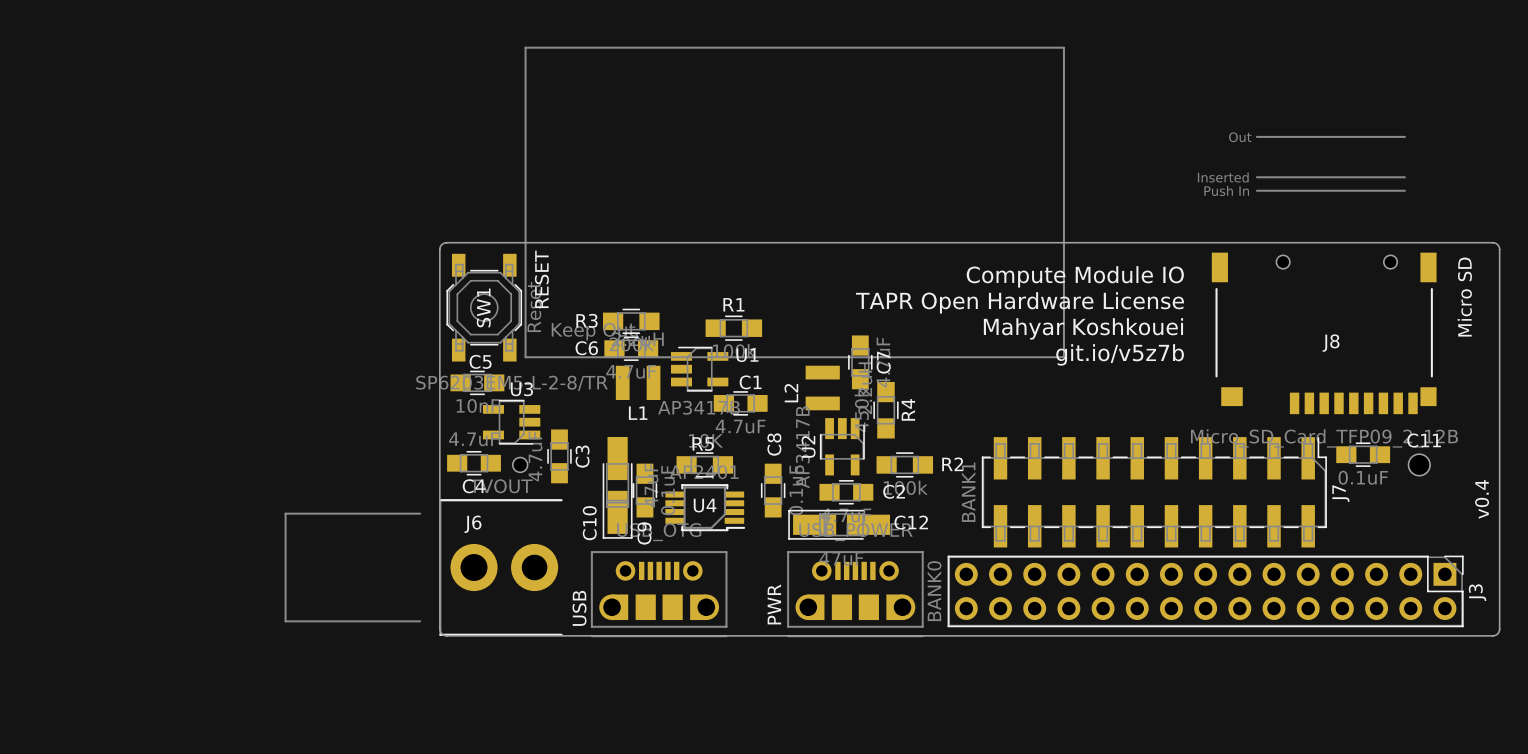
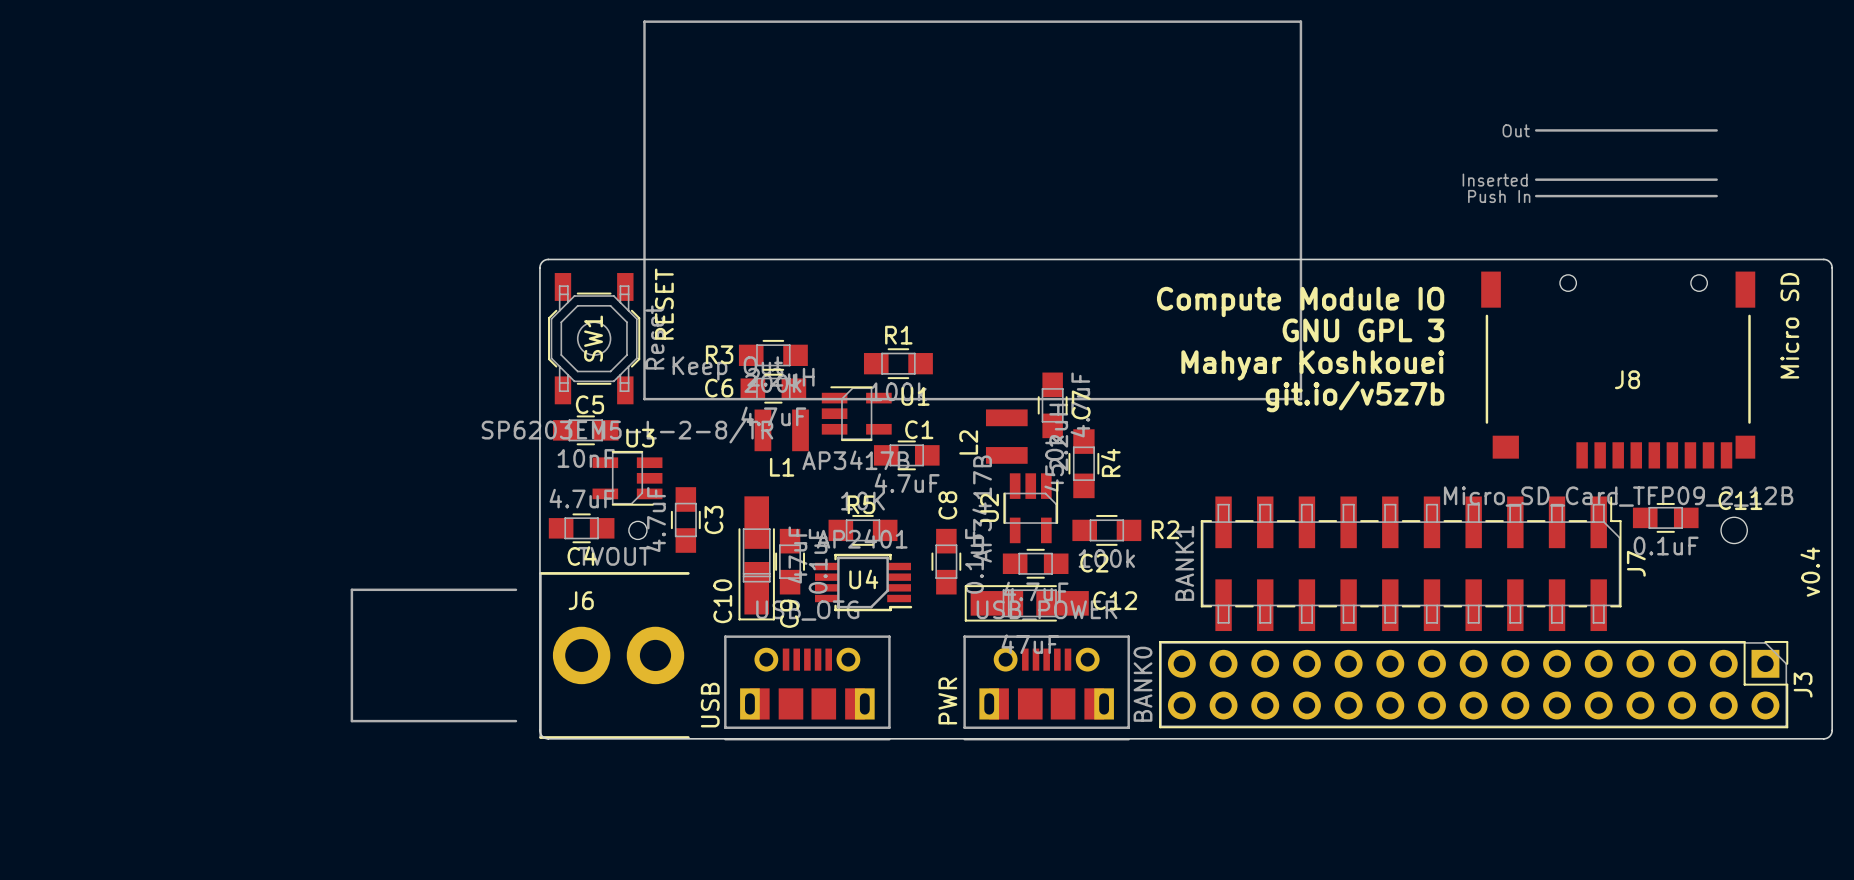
text: TAPR Open Hardware License (1019, 302) -> GNU GPL 3 (1363, 330)
part footprint: [590, 551, 728, 638] -> [724, 635, 891, 741]
part footprint: [787, 551, 924, 638] -> [963, 635, 1130, 741]

